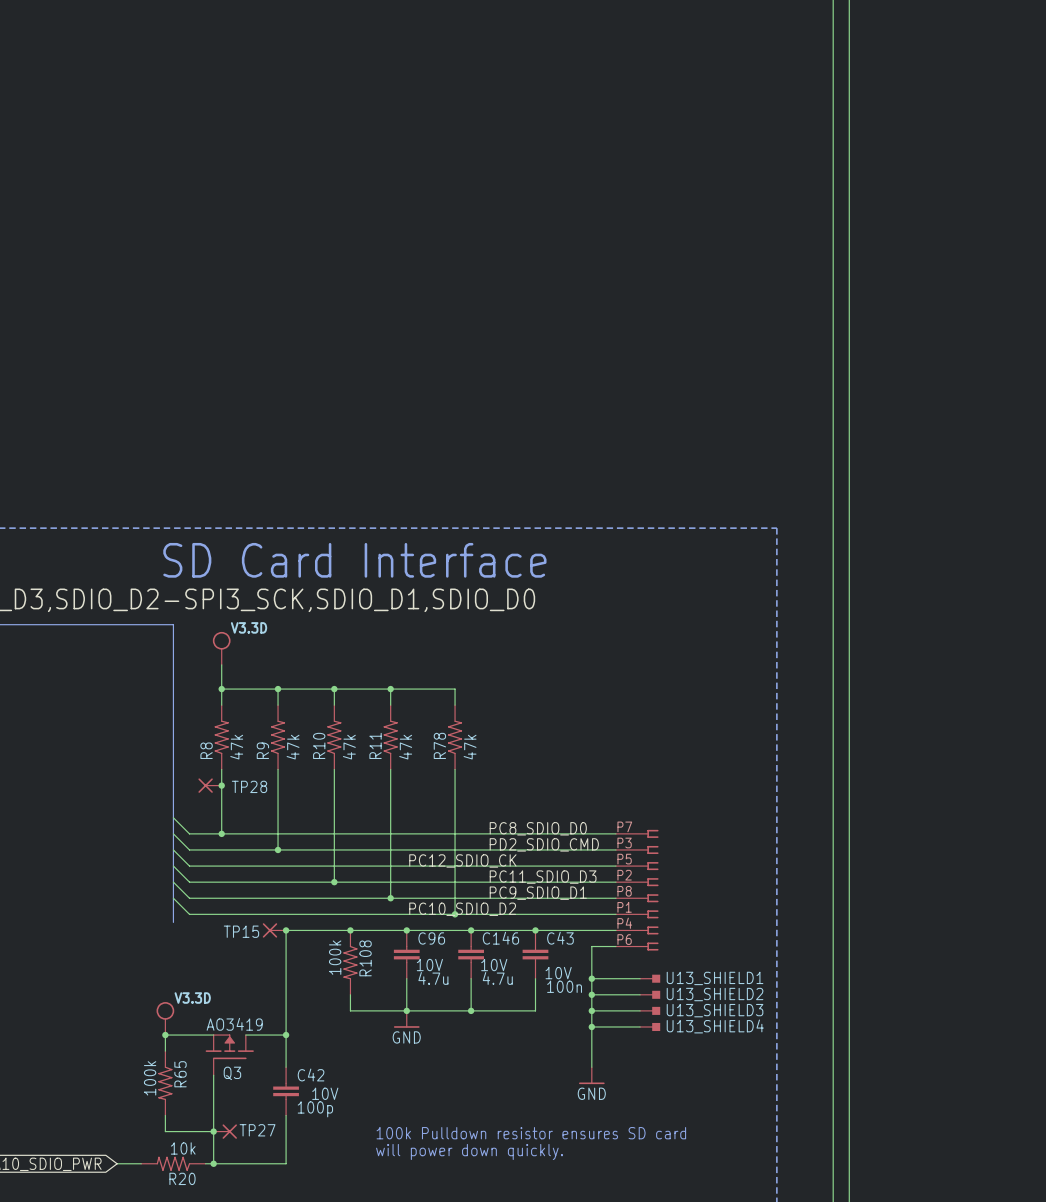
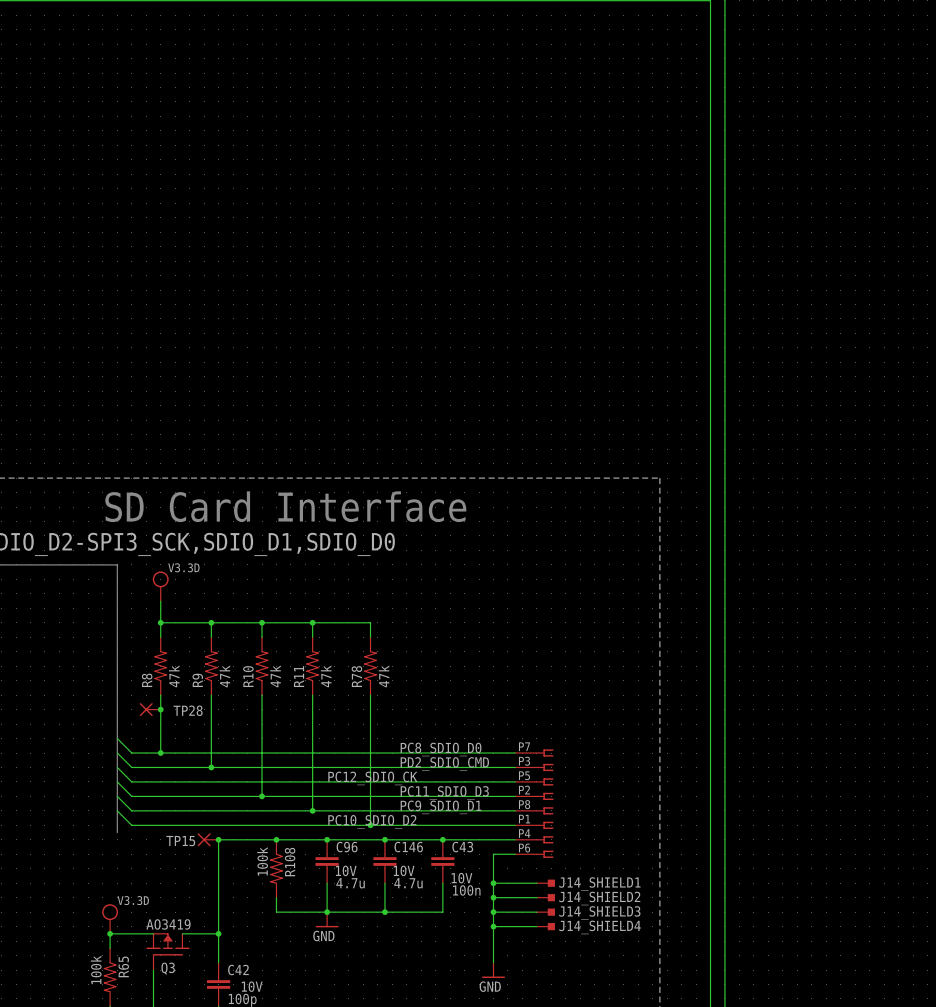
U13_SHIELD1 name: U13_SHIELD1 (715, 978) -> J14_SHIELD1 (599, 884)
U13_SHIELD2 name: U13_SHIELD2 (715, 994) -> J14_SHIELD2 (599, 898)
U13_SHIELD3 name: U13_SHIELD3 (715, 1010) -> J14_SHIELD3 (599, 912)
U13_SHIELD4 name: U13_SHIELD4 (715, 1026) -> J14_SHIELD4 (600, 927)

